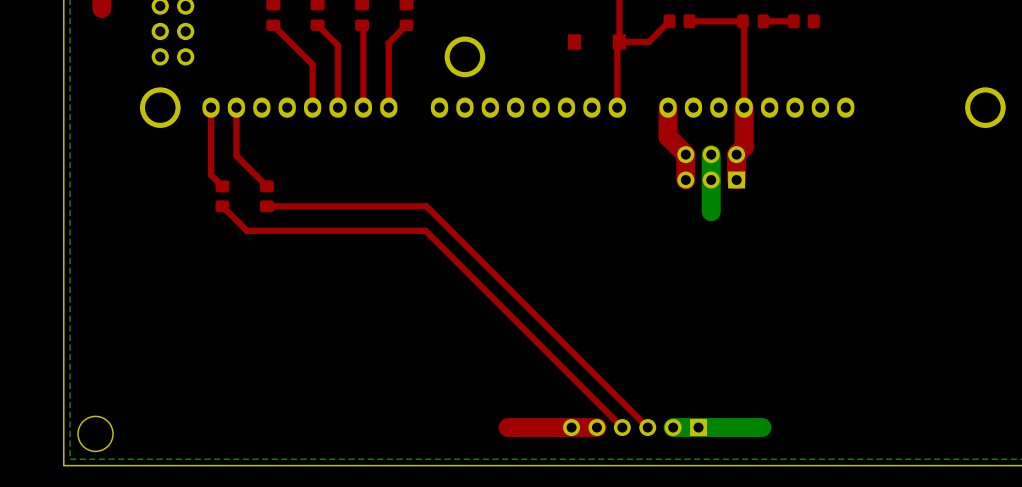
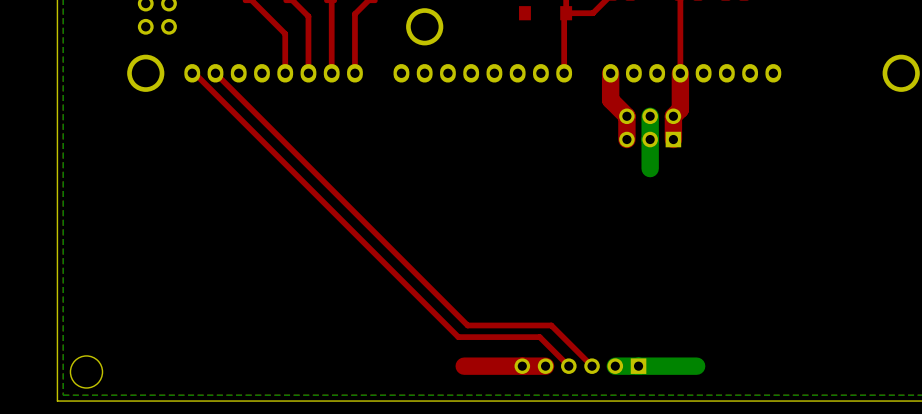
top track: (211, 107) (211, 174) (222, 186) -> none
top track: (236, 107) (236, 155) (266, 186) -> none
part: (222, 196) -> none
part: (266, 196) -> none
top track: (222, 206) (246, 230) (425, 230) (590, 395) -> (192, 73) (194, 73) (458, 337) (539, 337)
top track: (266, 206) (426, 206) (603, 383) -> (215, 73) (467, 325) (551, 325)

